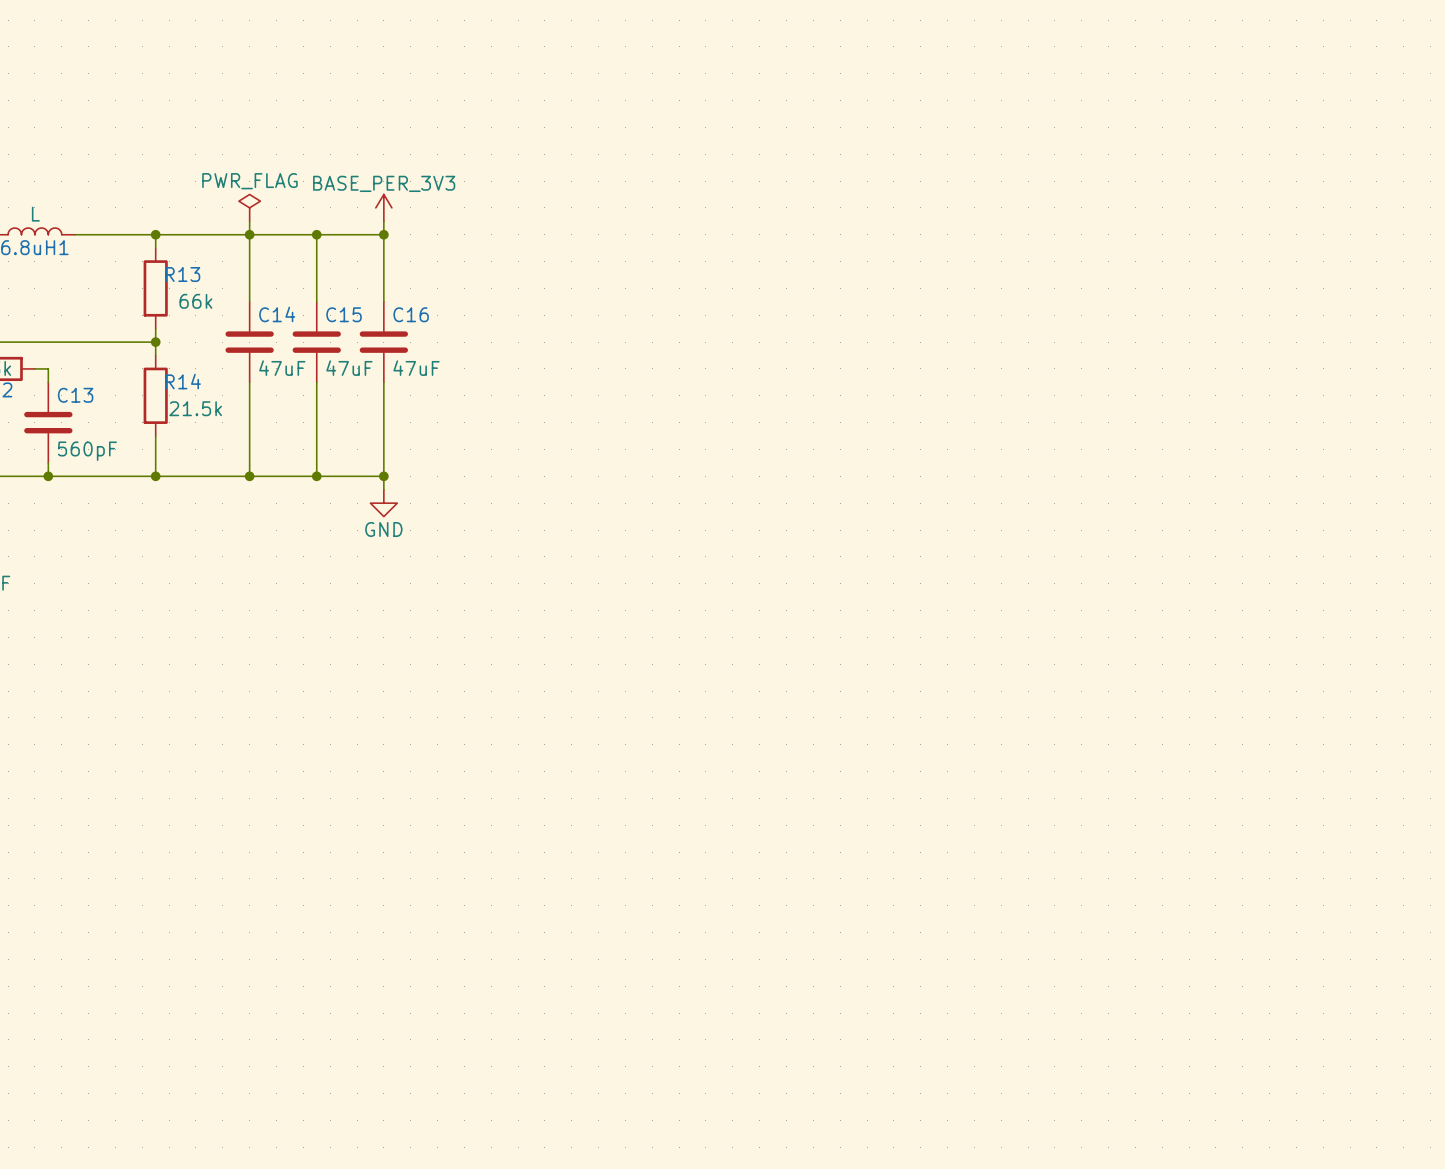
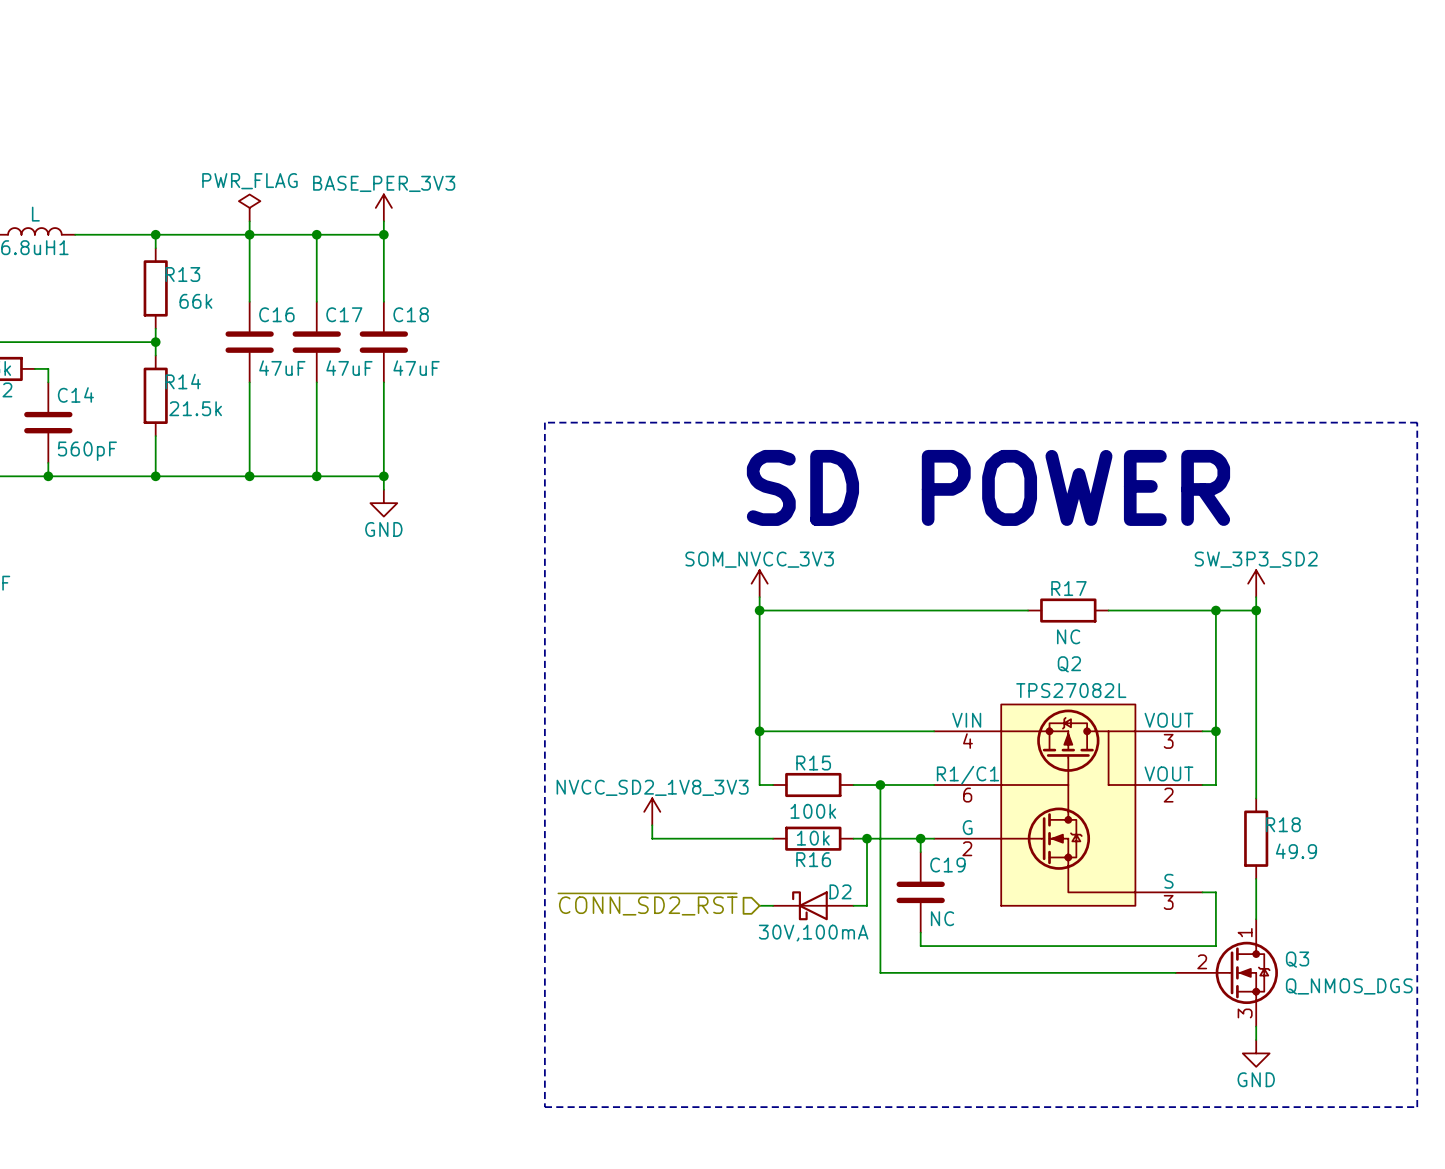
C14 name: C14 (277, 314) -> C16 (276, 314)
C15 name: C15 (344, 314) -> C17 (344, 314)
C16 name: C16 (411, 314) -> C18 (411, 314)
C13 name: C13 (75, 395) -> C14 (75, 394)
line: none -> (544, 422) (1417, 422) (1417, 1107) (544, 1107) (544, 422)
text: none -> SD POWER (988, 487)
power symbol: none -> SOM_NVCC_3V3 (759, 583)
power symbol: none -> SW_3P3_SD2 (1256, 583)
wire: none -> (759, 597) (759, 785) (773, 785)
wire: none -> (1256, 597) (1256, 798)
wire: none -> (759, 610) (1028, 610)
junction: none -> (759, 610)
R17: none -> NC (1068, 610)
wire: none -> (1108, 610) (1256, 610)
wire: none -> (1215, 610) (1215, 785) (1202, 785)
junction: none -> (1215, 610)
junction: none -> (1256, 610)
wire: none -> (759, 731) (934, 731)
junction: none -> (759, 731)
wire: none -> (1202, 731) (1215, 731)
junction: none -> (1215, 731)
R15: none -> 100k (813, 785)
wire: none -> (853, 785) (934, 785)
wire: none -> (880, 785) (880, 972) (1175, 972)
junction: none -> (880, 785)
Q2: none -> TPS27082L (1068, 805)
power symbol: none -> NVCC_SD2_1V8_3V3 (652, 811)
wire: none -> (652, 825) (652, 838) (773, 838)
R16: none -> 10k (813, 838)
wire: none -> (853, 838) (934, 838)
wire: none -> (867, 838) (867, 905) (853, 905)
junction: none -> (867, 838)
wire: none -> (920, 838) (920, 852)
junction: none -> (920, 838)
R18: none -> 49.9 (1256, 838)
wire: none -> (1256, 878) (1256, 919)
C19: none -> NC (920, 892)
wire: none -> (1202, 892) (1215, 892) (1215, 946) (920, 946) (920, 932)
hierarchical label: none -> ~{CONN_SD2_RST} (647, 904)
wire: none -> (759, 905) (773, 905)
D2: none -> 30V,100mA (813, 905)
Q3: none -> Q_NMOS_DGS (1226, 972)
wire: none -> (1256, 1026) (1256, 1039)
power symbol: none -> GND (1256, 1053)

